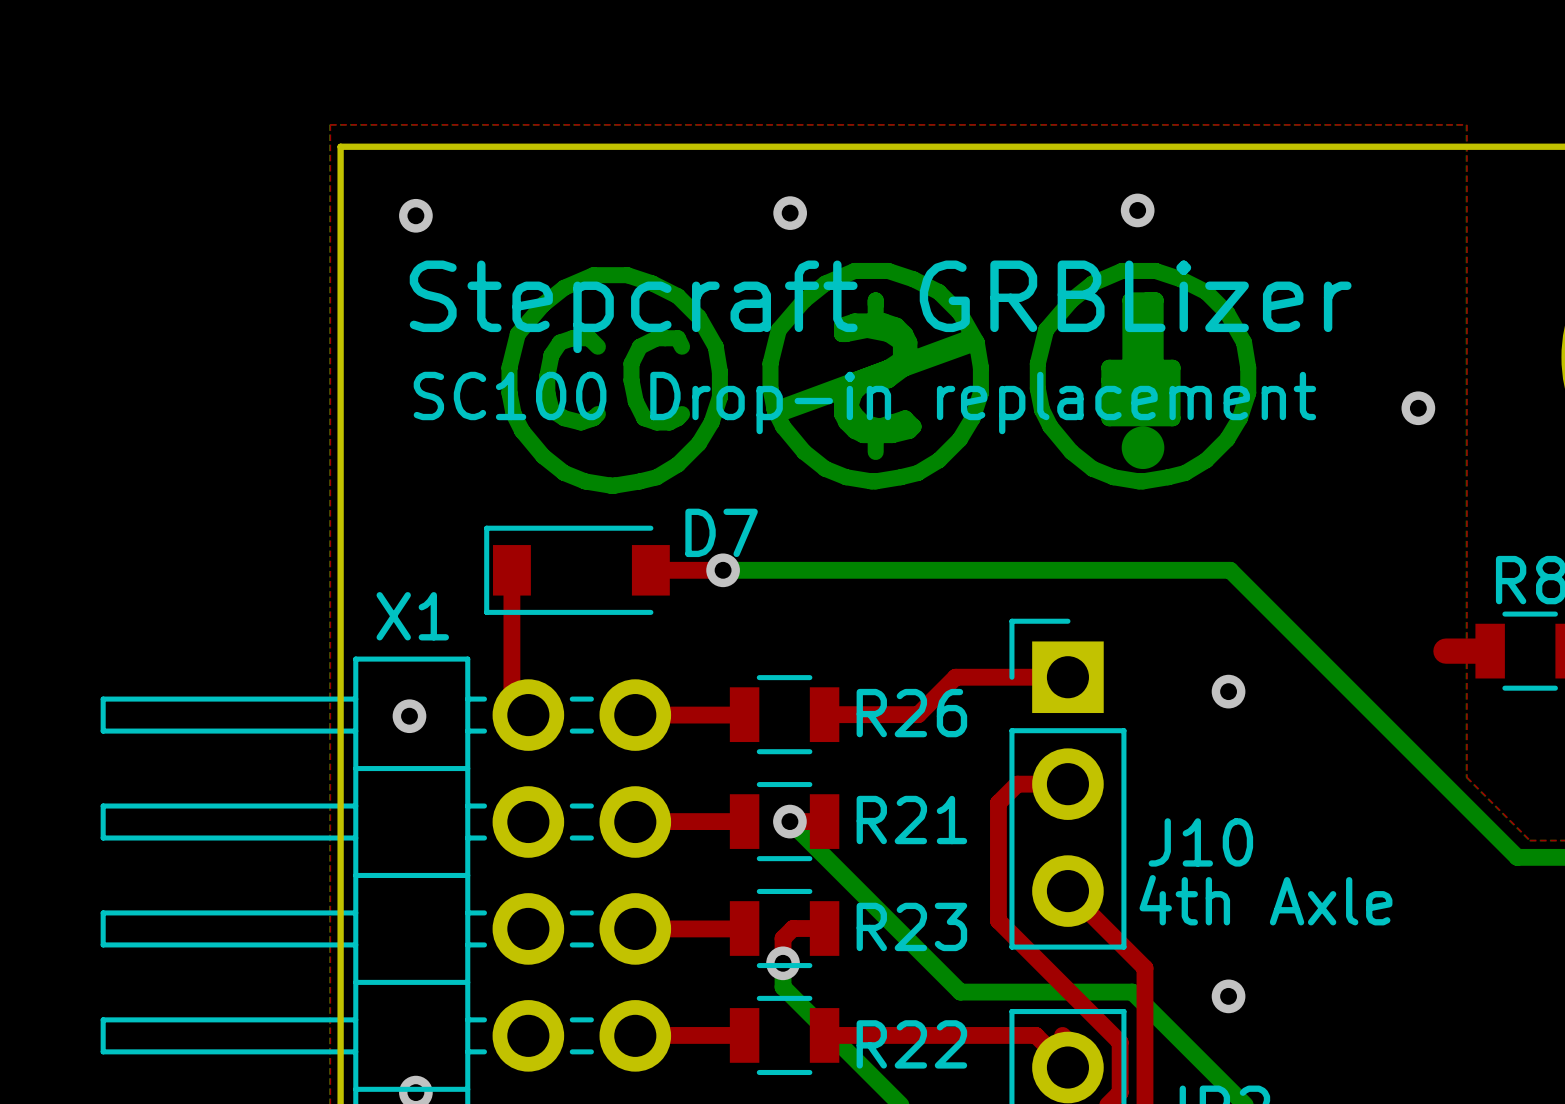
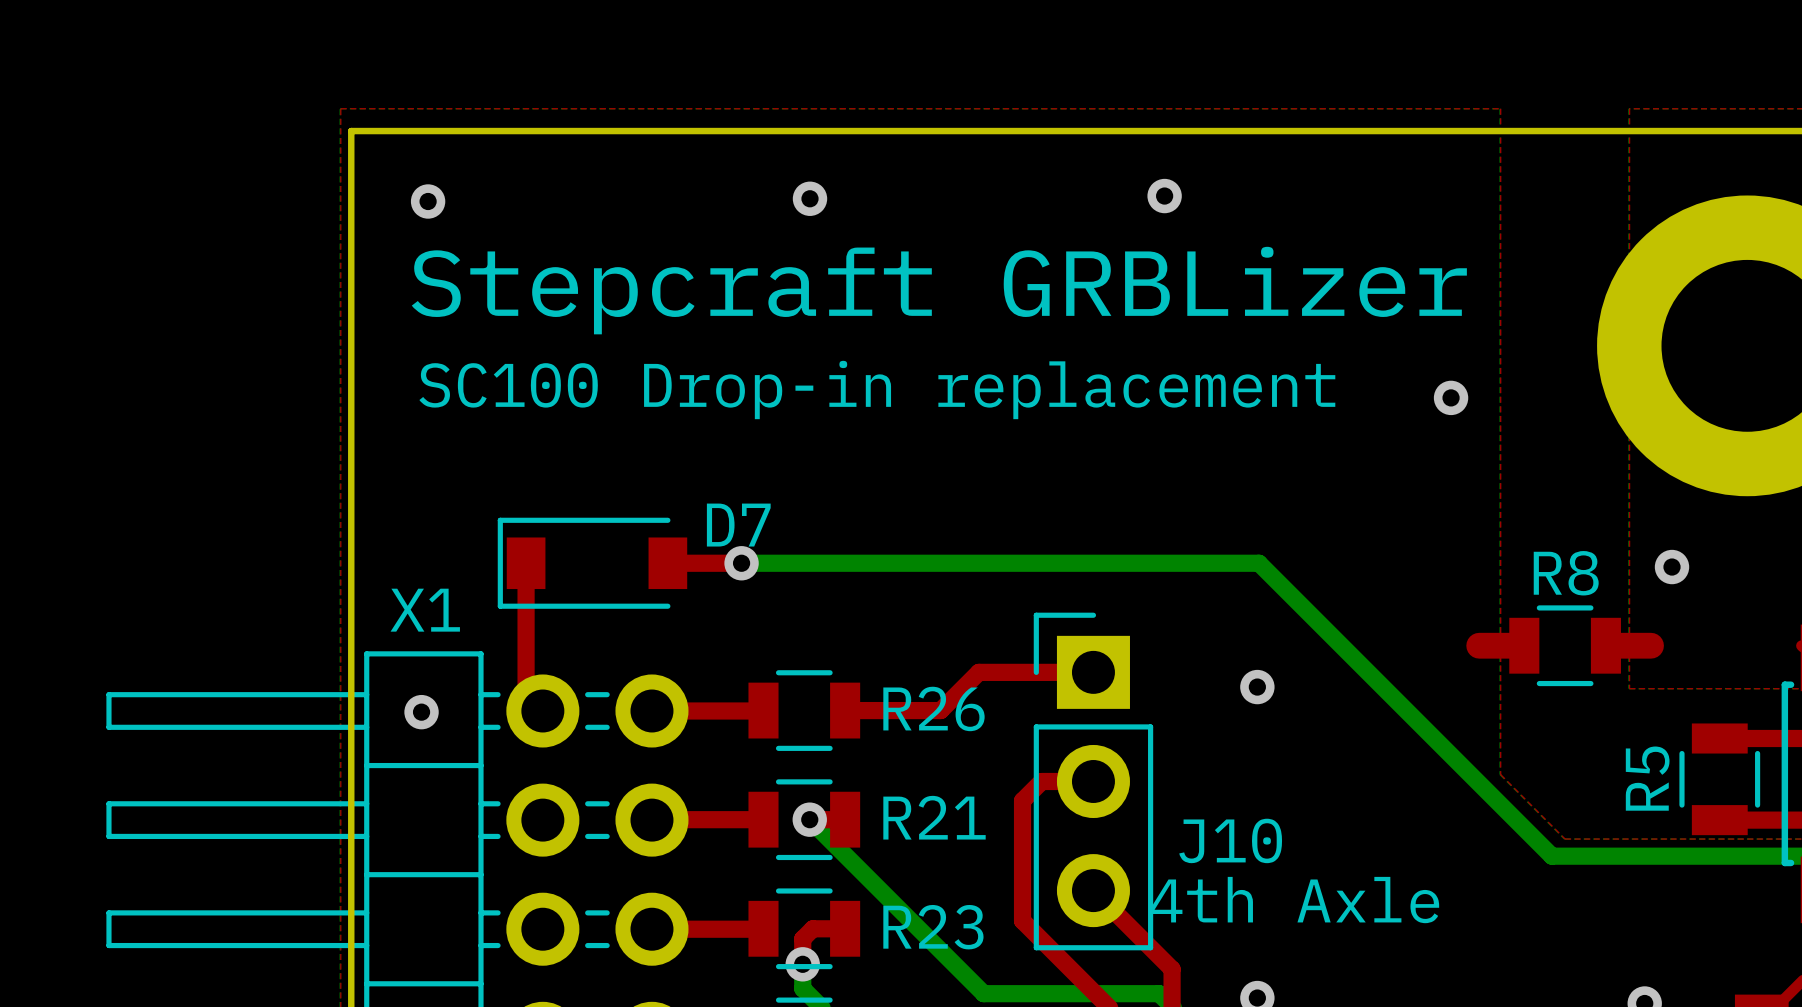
drawing: [501, 262, 1257, 494] -> none

